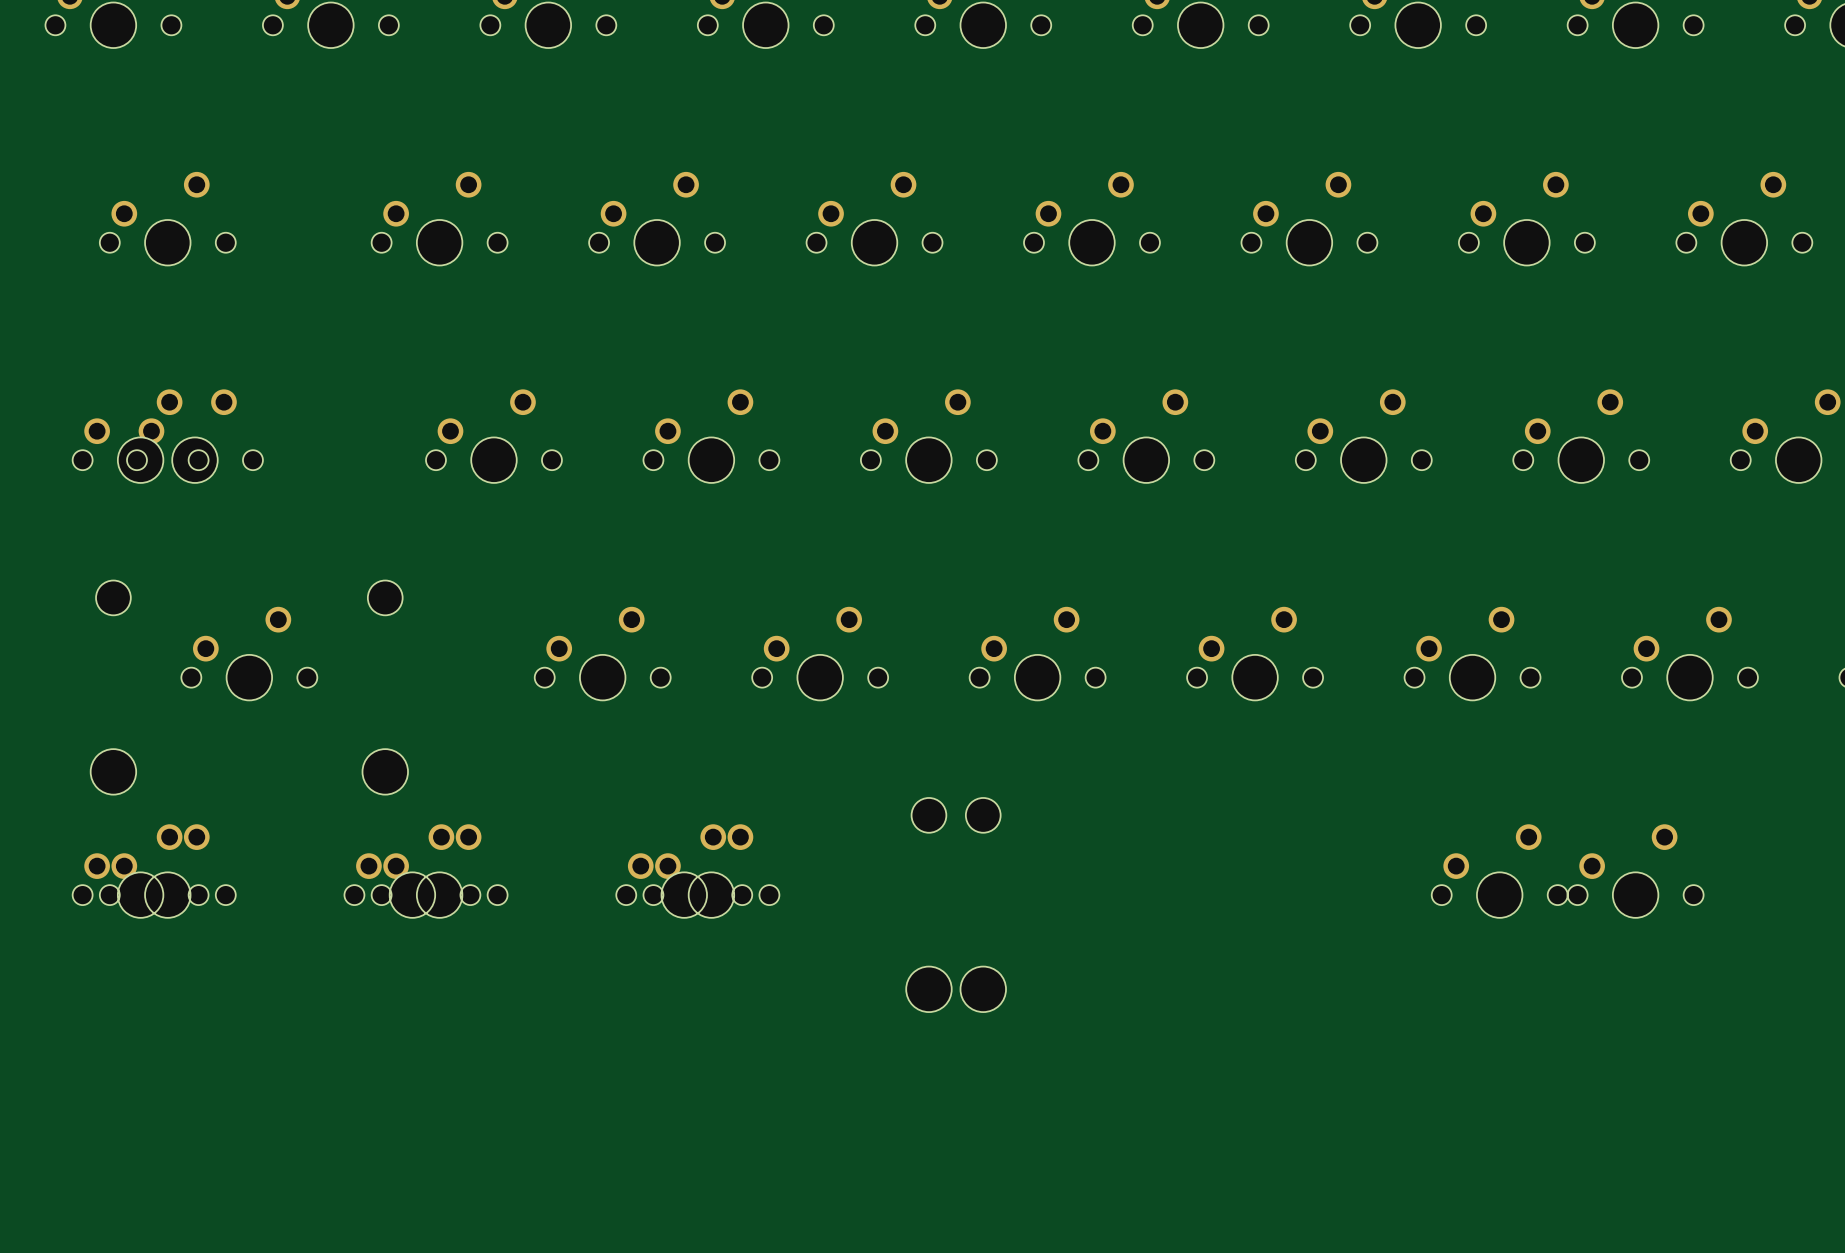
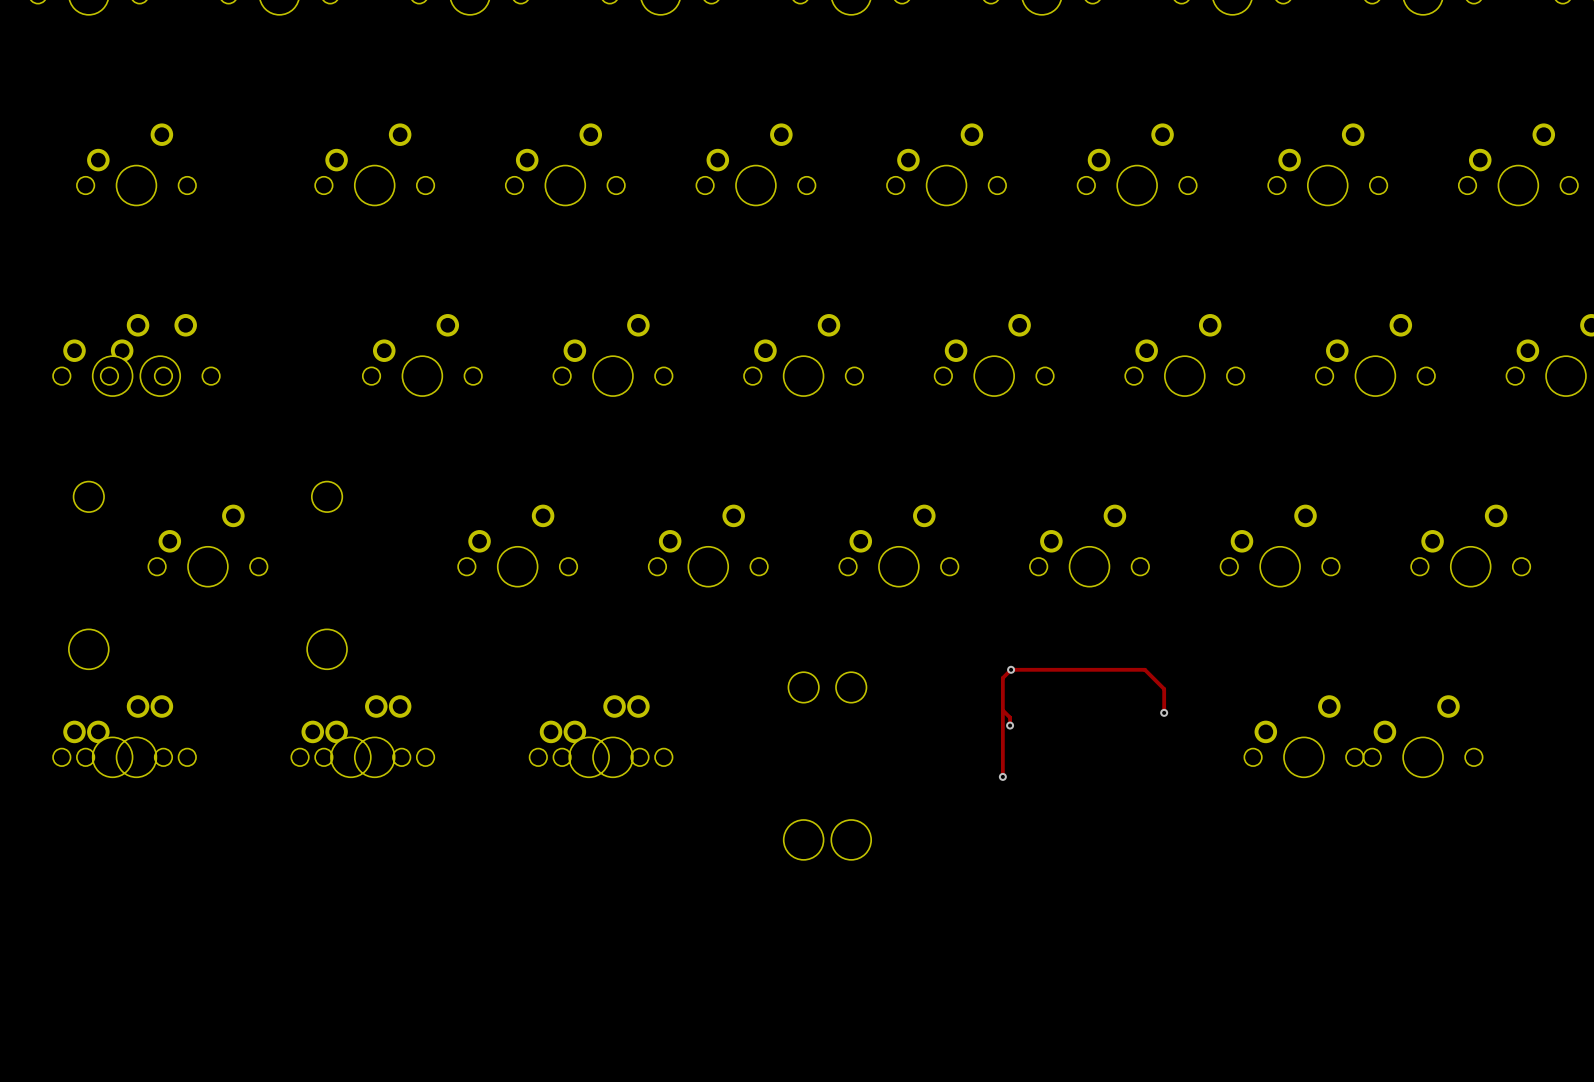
via: none -> (1011, 669)
track: none -> (1002, 710) (1010, 717) (1010, 725)
track: none -> (1164, 712) (1164, 689) (1144, 669) (1011, 669) (1002, 678) (1002, 776)
via: none -> (1164, 712)
via: none -> (1010, 725)
via: none -> (1002, 776)

